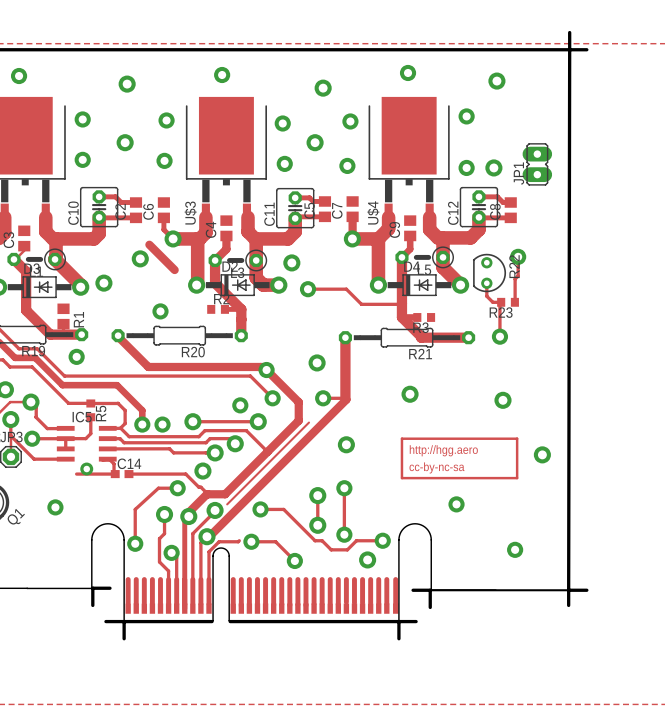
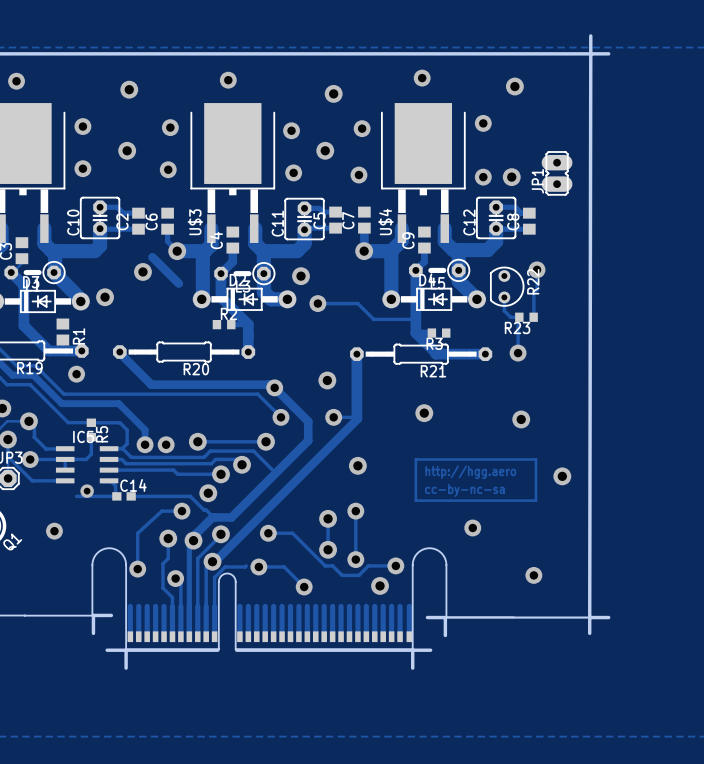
via: (160, 311) -> none
via: (240, 405) -> none
track: (309, 422) (227, 504) -> none

